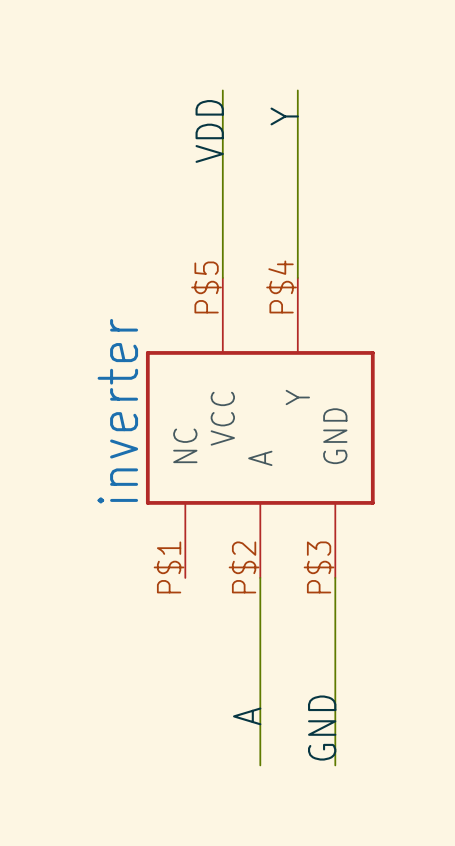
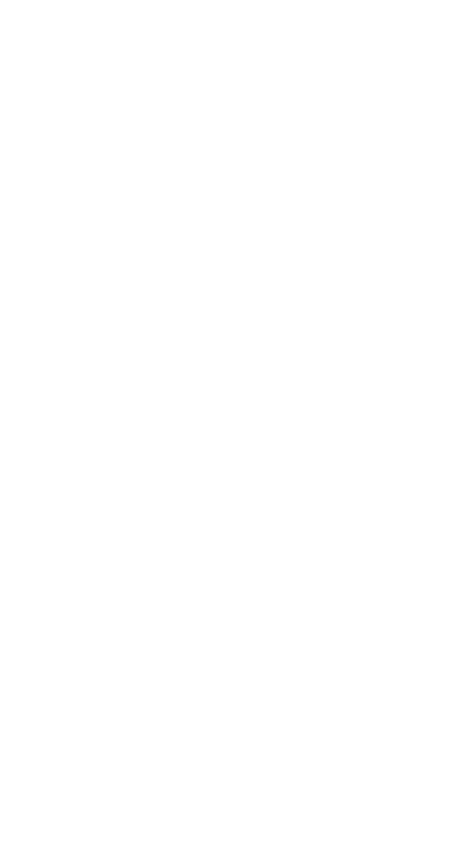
wire: (222, 90) (222, 277) -> none
wire: (297, 90) (297, 277) -> none
label: Y (284, 116) -> none
label: VDD (209, 131) -> none
part: (260, 427) -> none
wire: (260, 577) (260, 765) -> none
wire: (335, 577) (335, 765) -> none
label: A (247, 716) -> none
label: GND (322, 728) -> none

